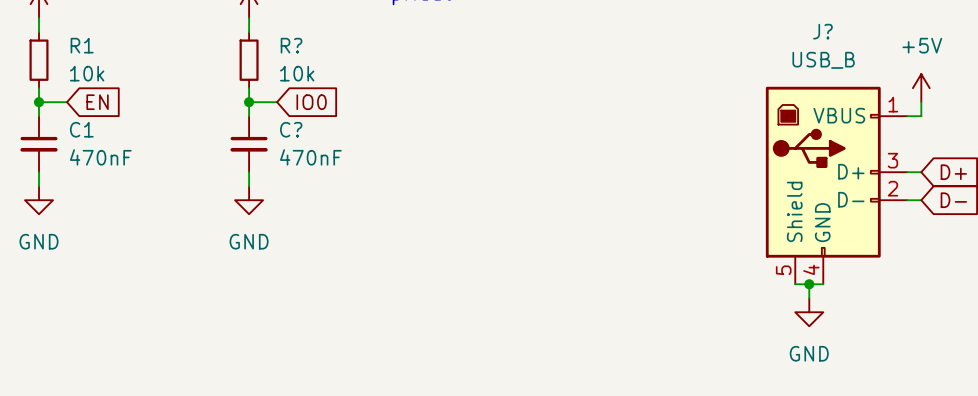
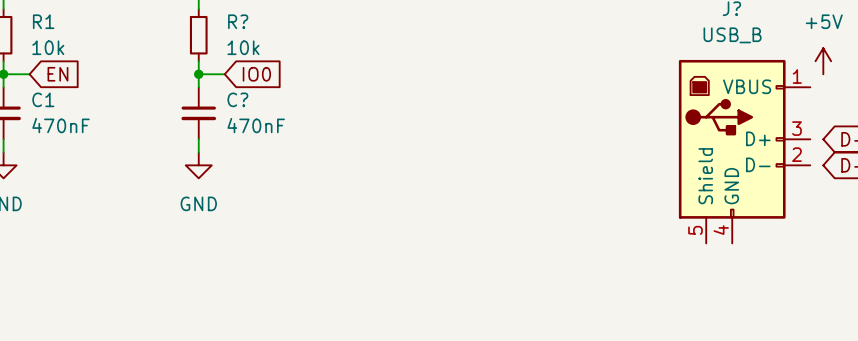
wire: (921, 102) (921, 116) (907, 116) -> none
wire: (907, 172) (921, 172) -> none
wire: (907, 200) (921, 200) -> none
wire: (795, 284) (823, 284) -> none
wire: (809, 284) (809, 298) -> none
junction: (809, 284) -> none
power symbol: GND (809, 312) -> none

